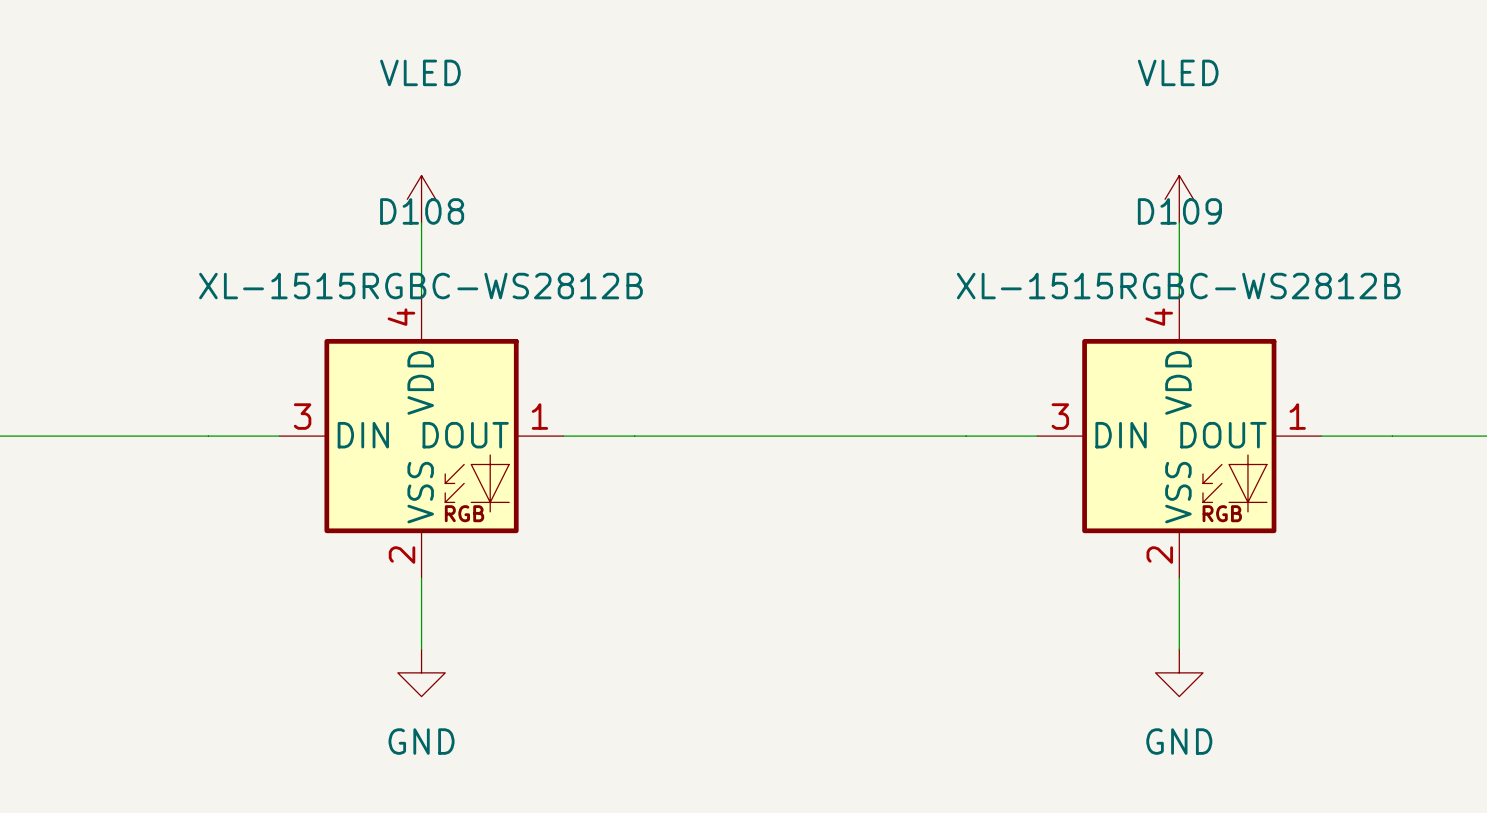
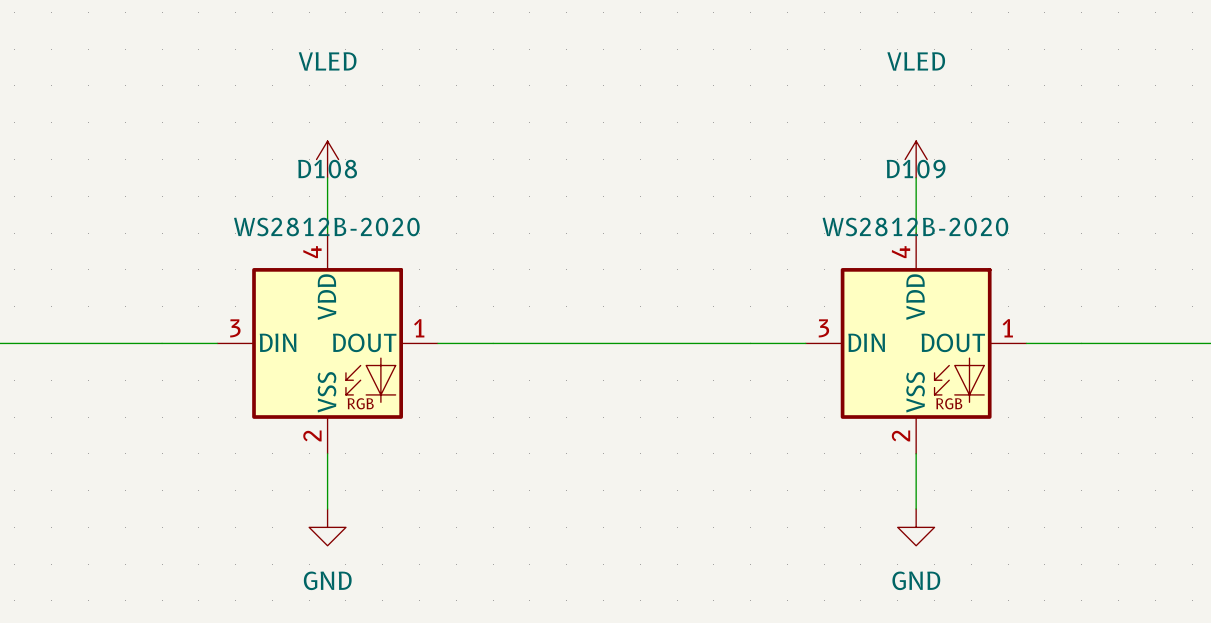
D108 value: XL-1515RGBC-WS2812B (420, 286) -> WS2812B-2020 (326, 226)
D109 value: XL-1515RGBC-WS2812B (1178, 286) -> WS2812B-2020 (915, 226)

